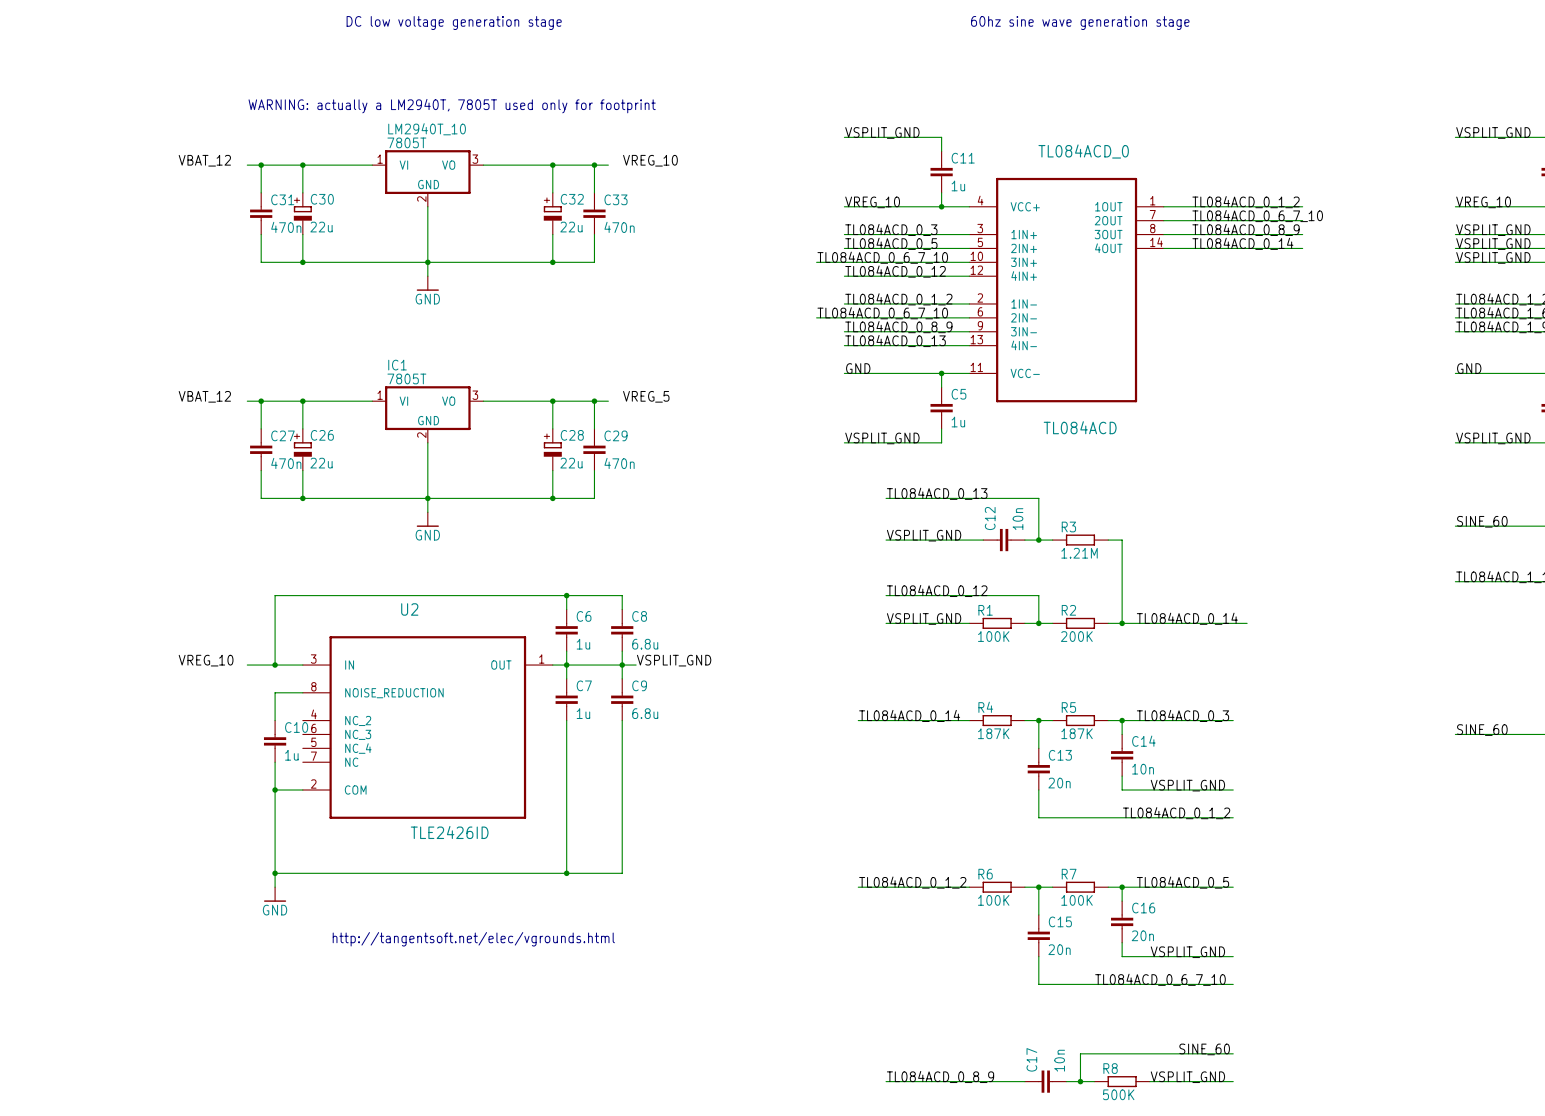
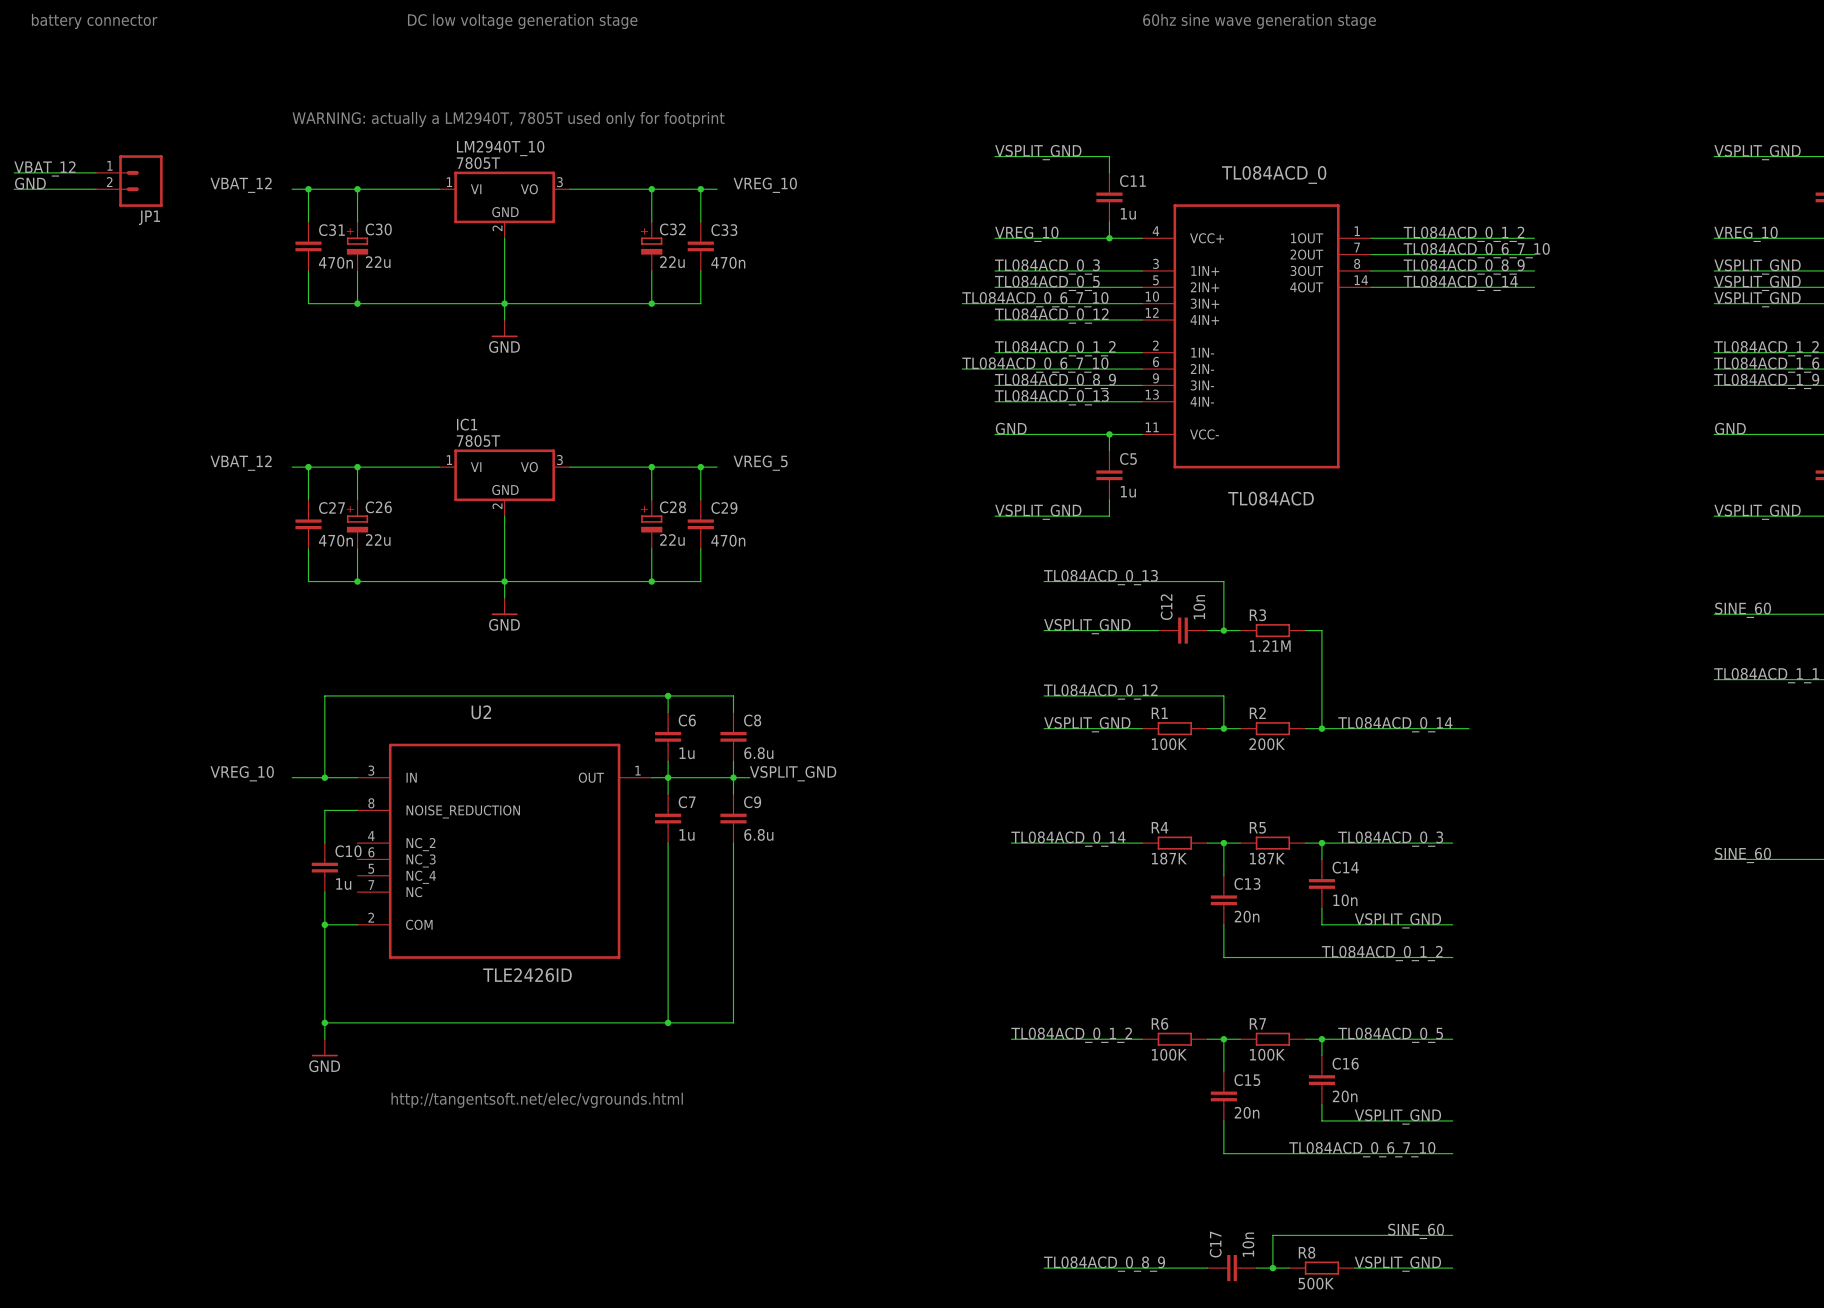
text: none -> battery connector (94, 21)
label: none -> VBAT_12 (44, 168)
wire: none -> (14, 172) (95, 172)
JP1: none -> (129, 181)
label: none -> GND (30, 183)
wire: none -> (14, 189) (95, 189)

